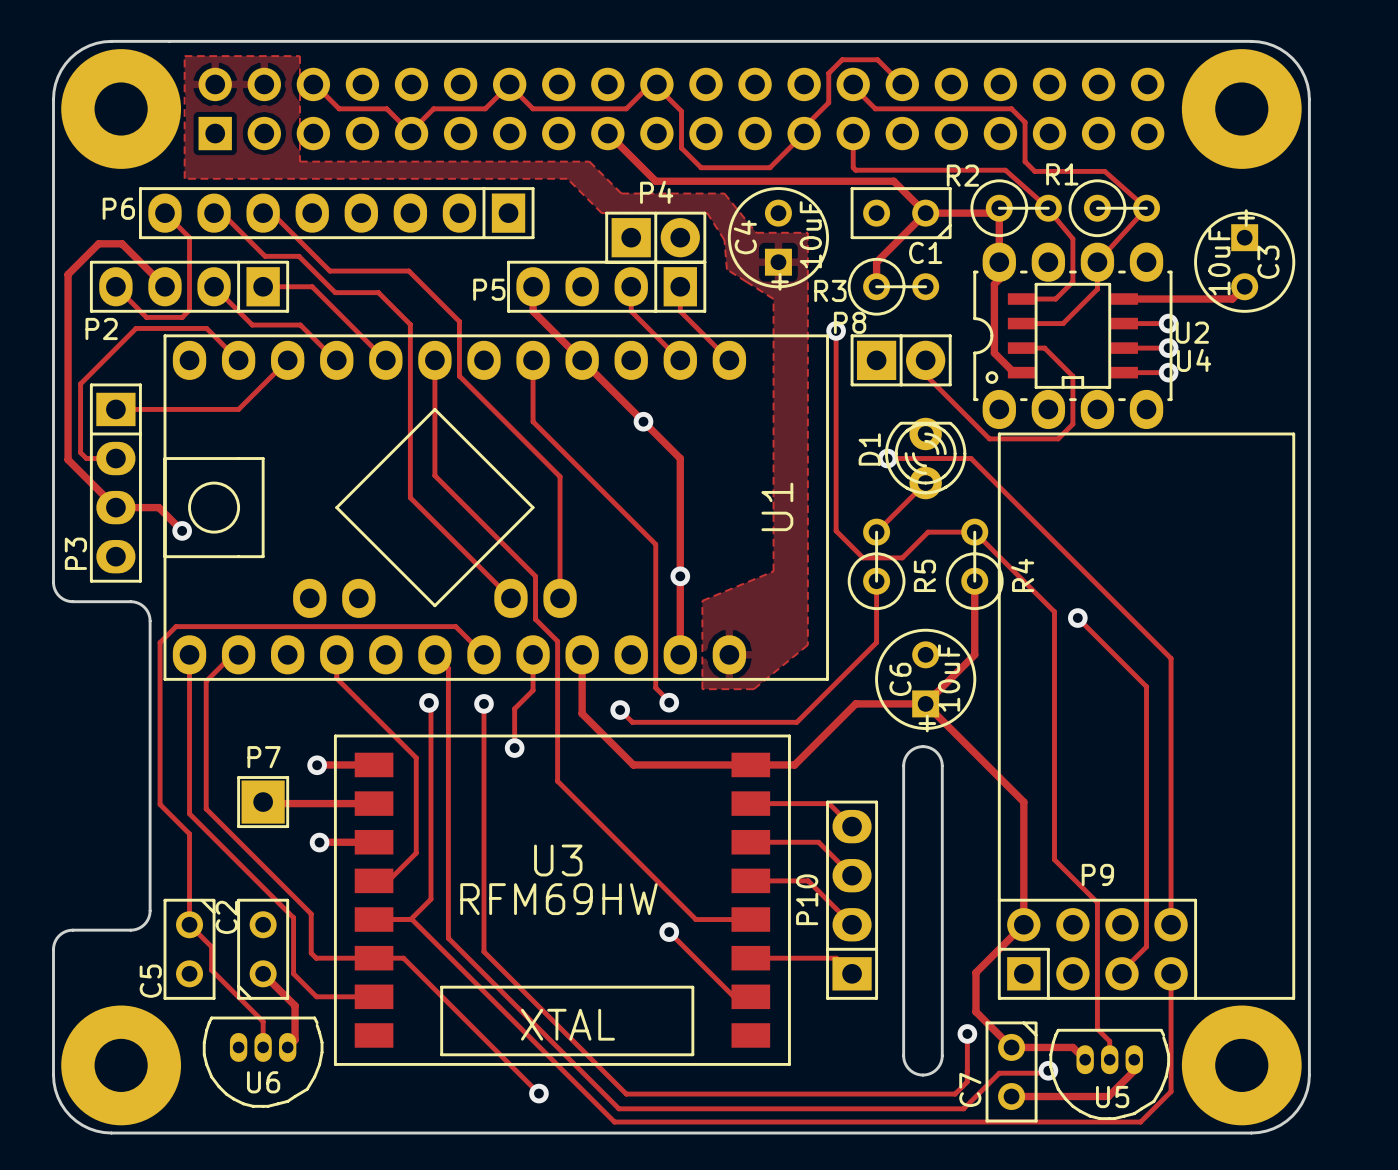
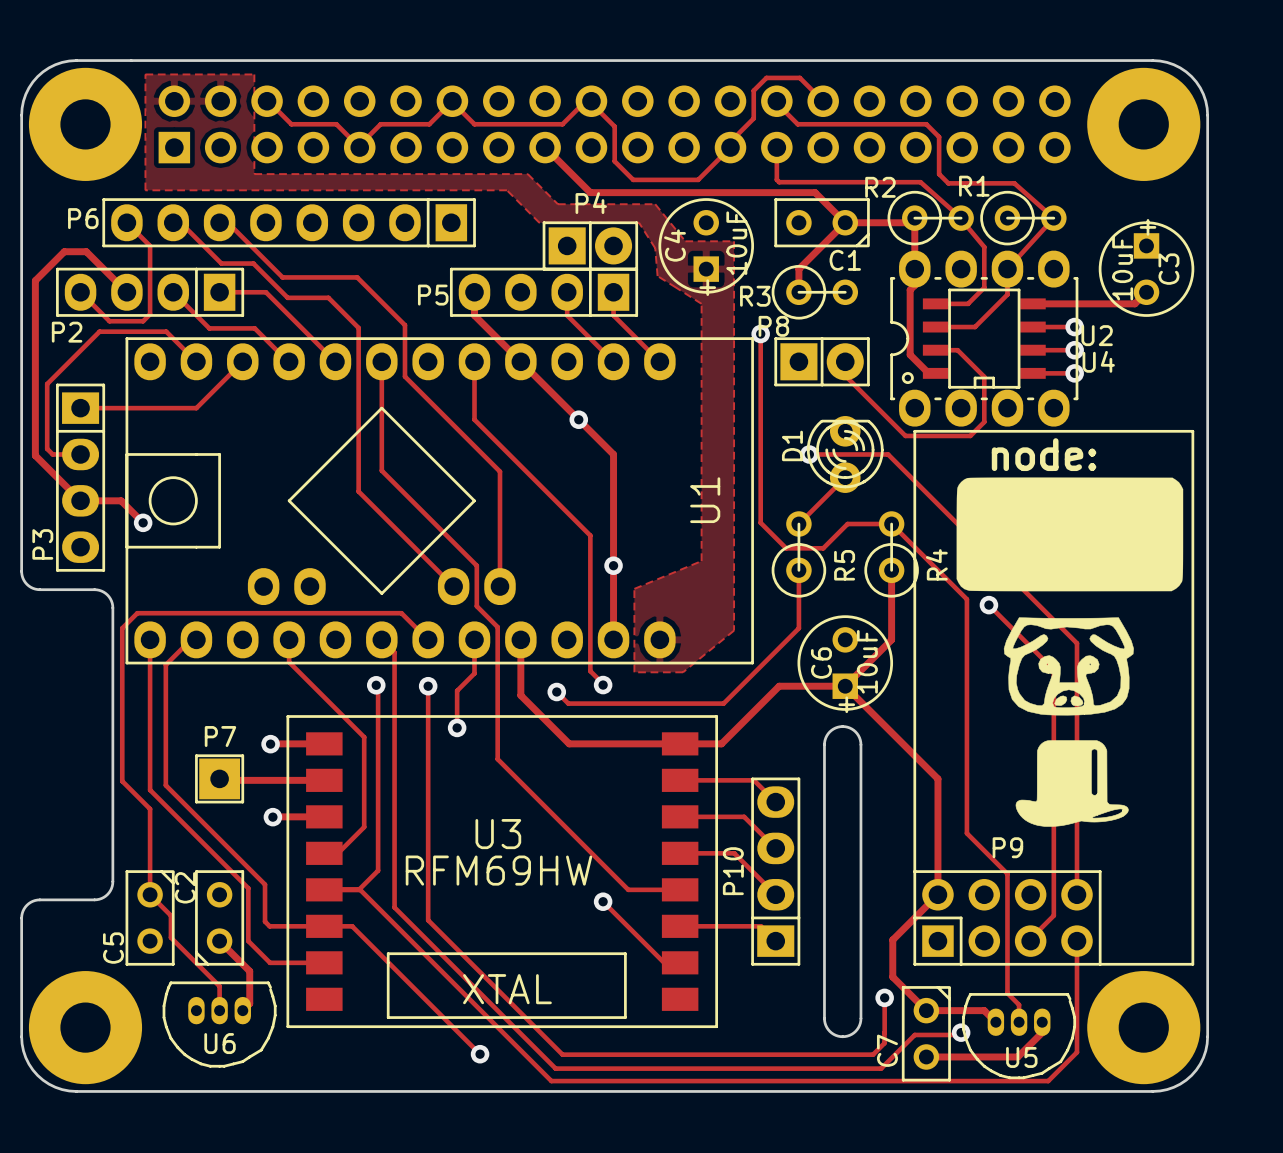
text: none -> node: (1044, 454)
drawing: none -> [956, 477, 1184, 592]
drawing: none -> [1003, 617, 1134, 716]
drawing: none -> [1015, 740, 1129, 827]

